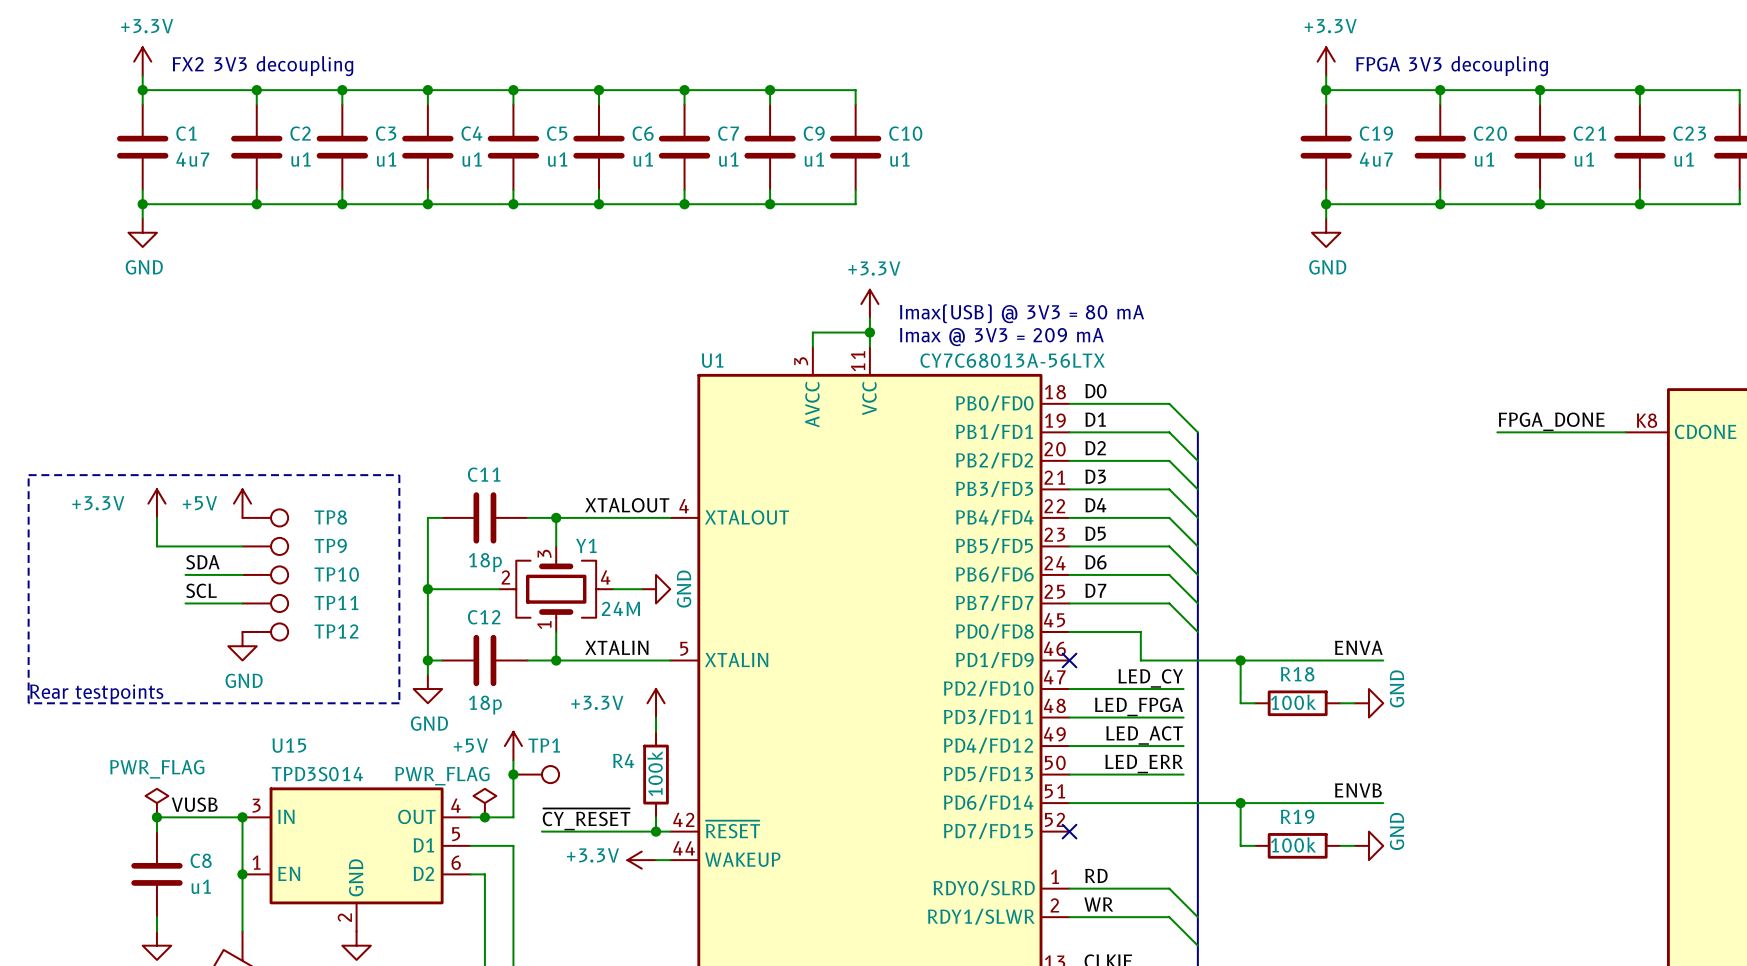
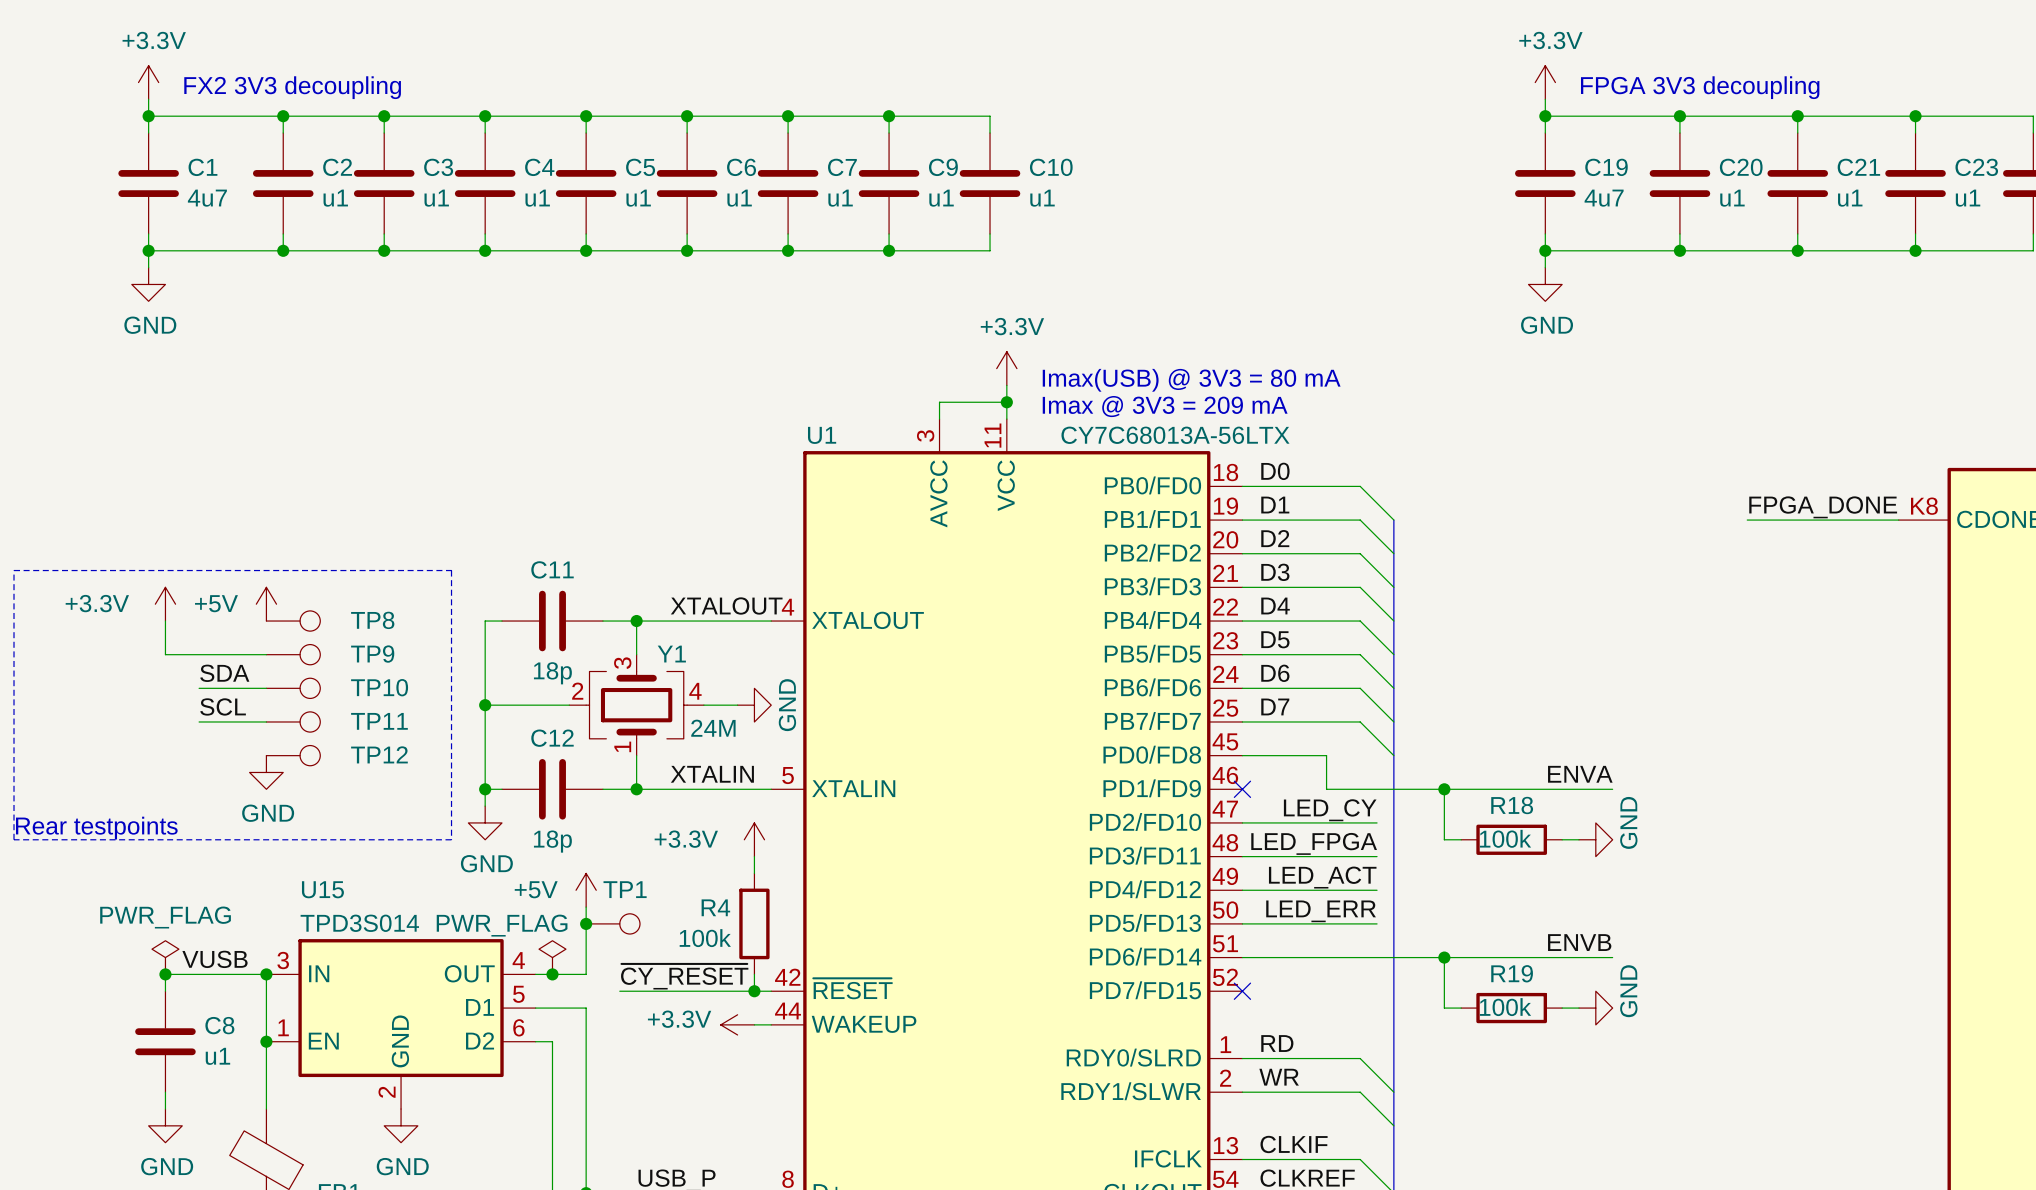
R4 value rotation: 0° (655, 773) -> 90° clockwise (705, 938)

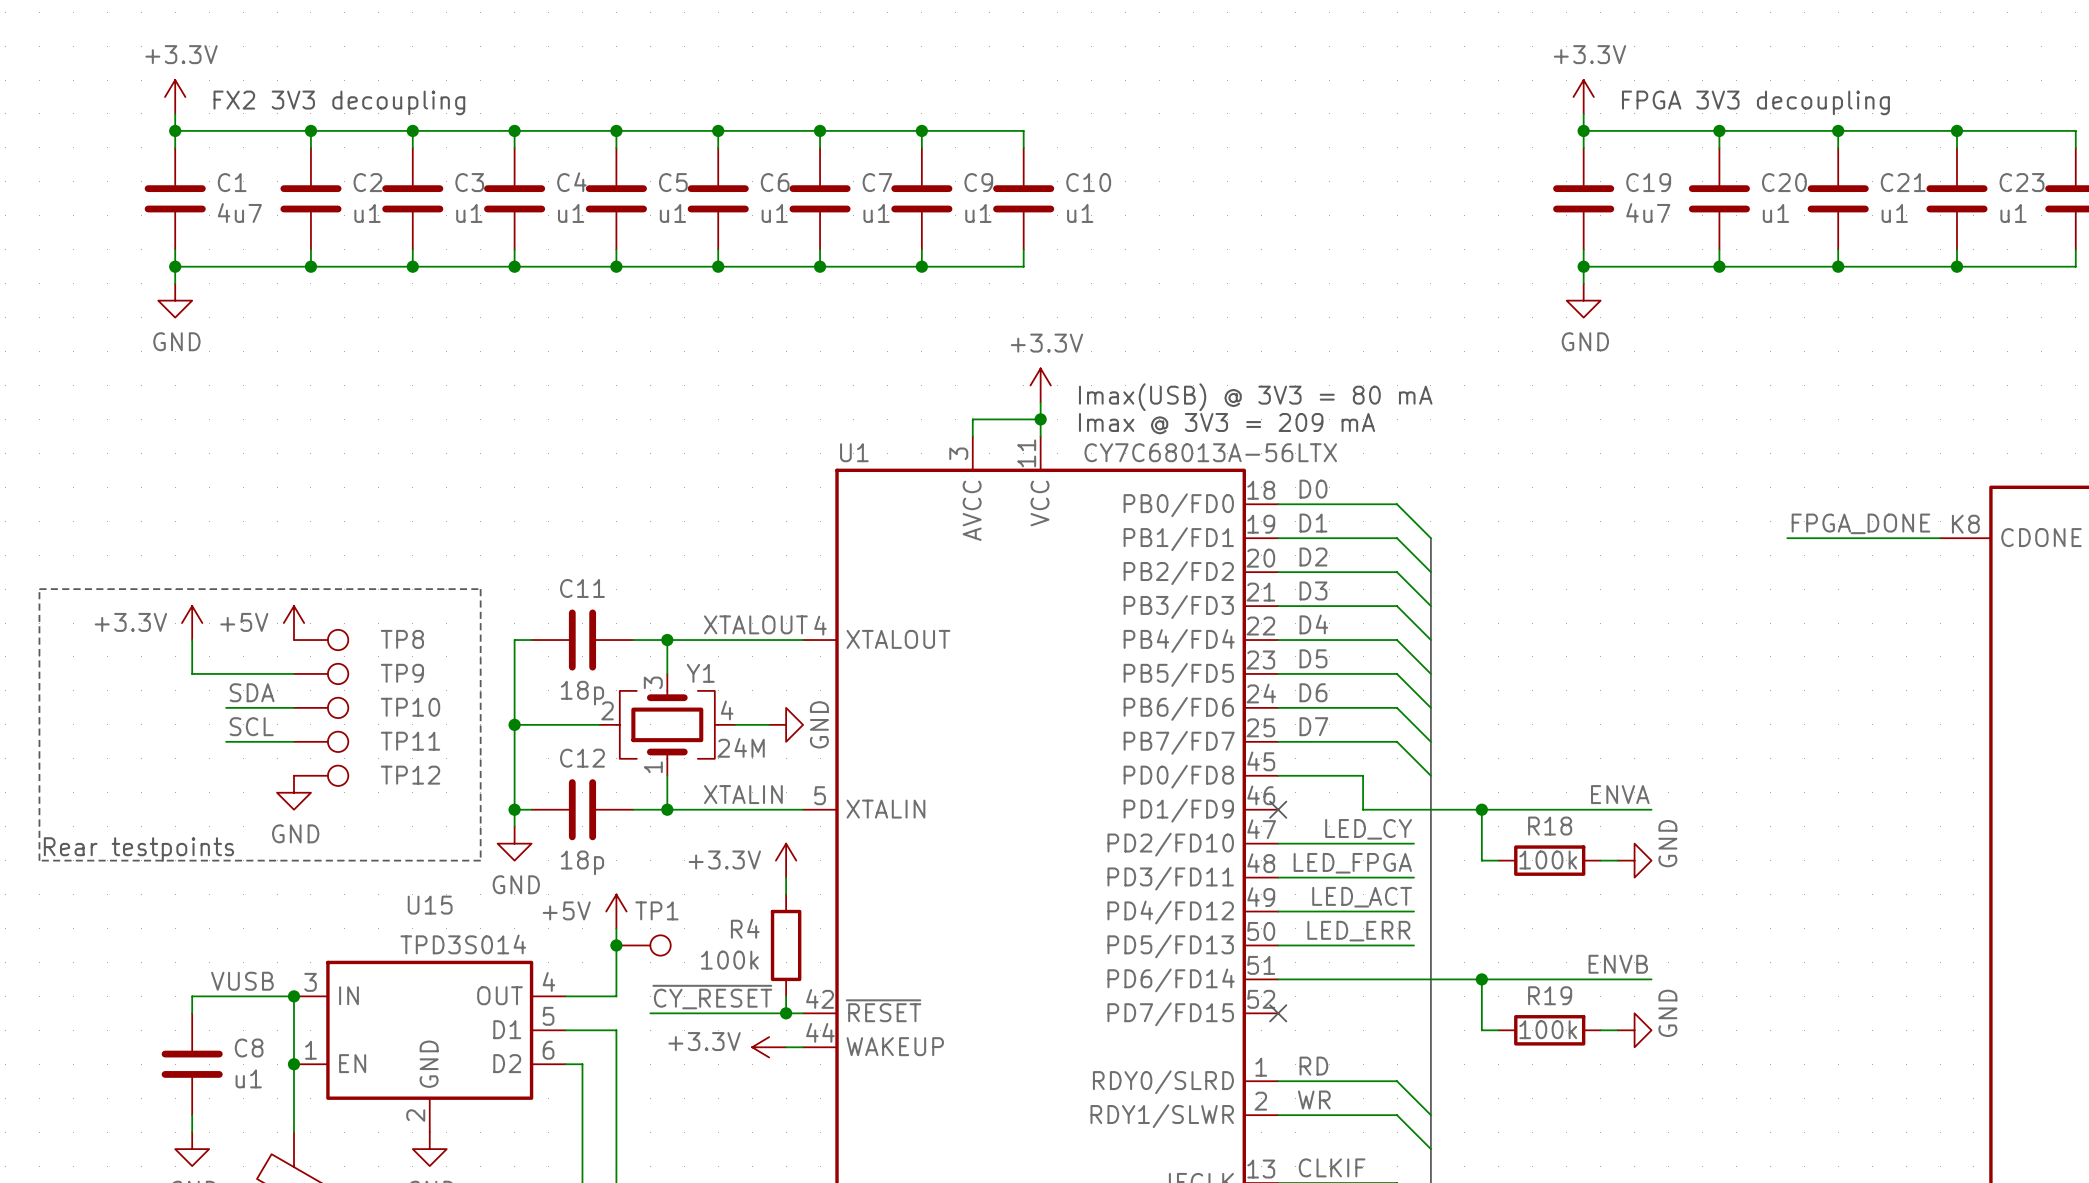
U15 name position: U15 (322, 889) -> U15 (430, 905)
U15 value position: TPD3S014 (359, 923) -> TPD3S014 (463, 944)
power symbol: PWR_FLAG (165, 957) -> none
power symbol: PWR_FLAG (552, 957) -> none
junction: (165, 974) -> none
junction: (552, 974) -> none

